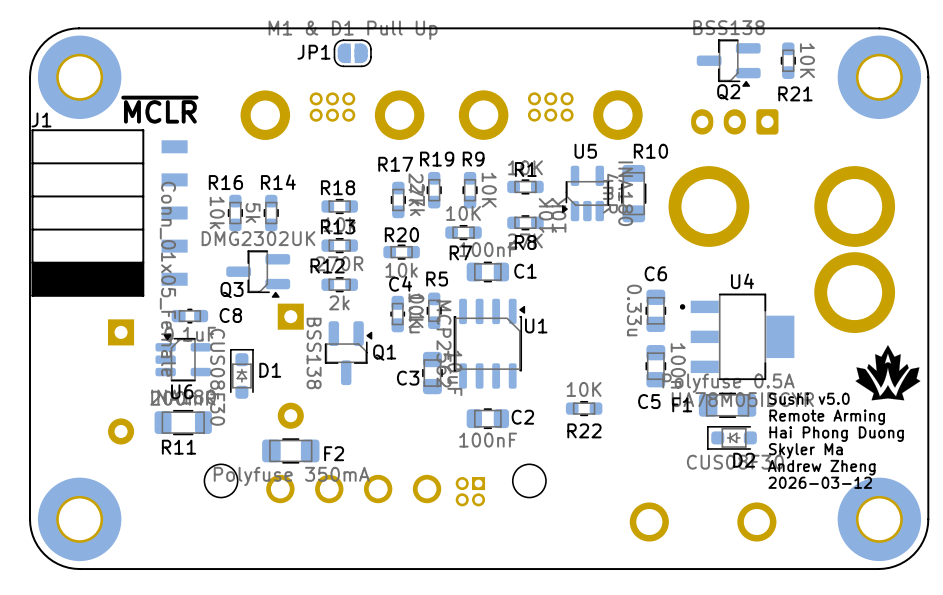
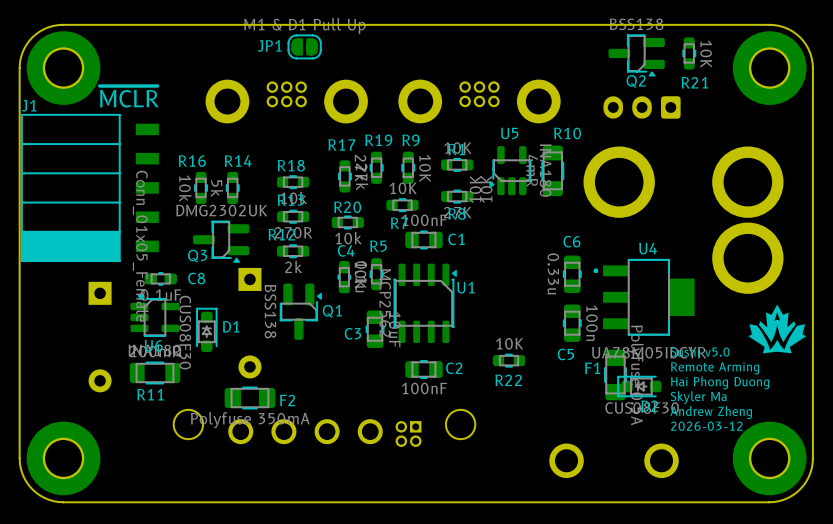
F1 rotation: 0° (727, 405) -> 90° clockwise (615, 375)

